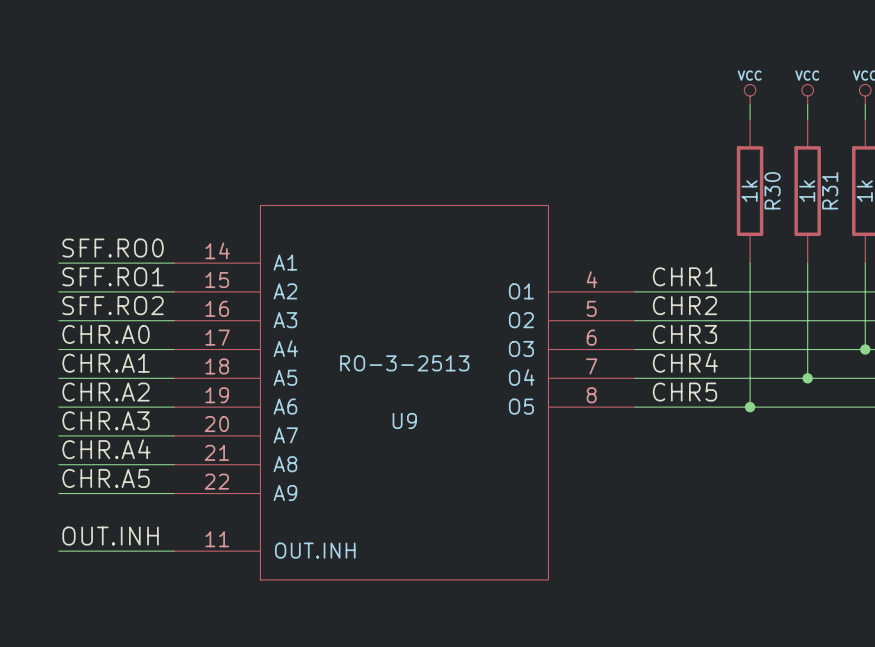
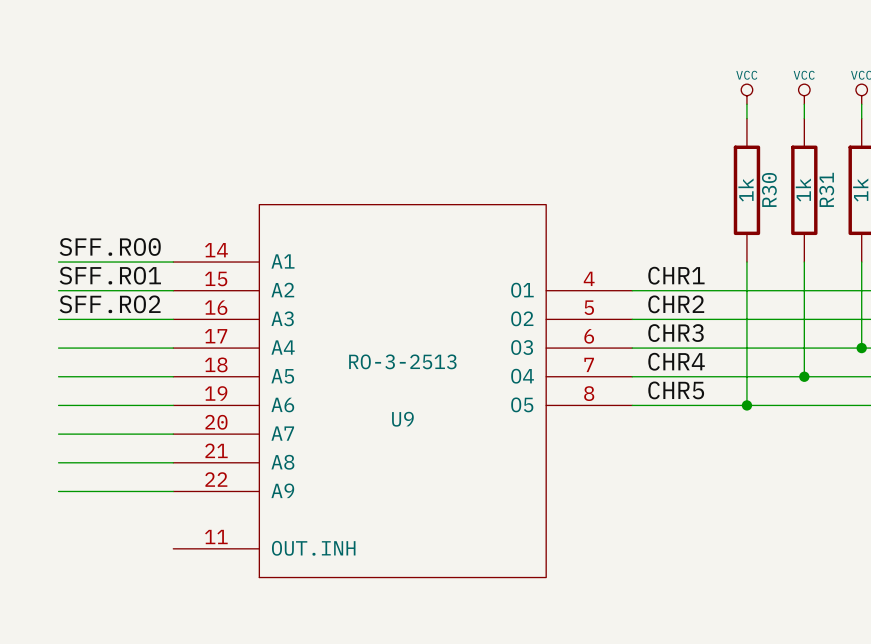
label: CHR.A0 (106, 334) -> none
label: CHR.A1 (106, 363) -> none
label: CHR.A2 (106, 392) -> none
label: CHR.A3 (106, 420) -> none
label: CHR.A4 (106, 449) -> none
label: CHR.A5 (106, 478) -> none
label: OUT.INH (110, 536) -> none
wire: (58, 551) (174, 551) -> none

